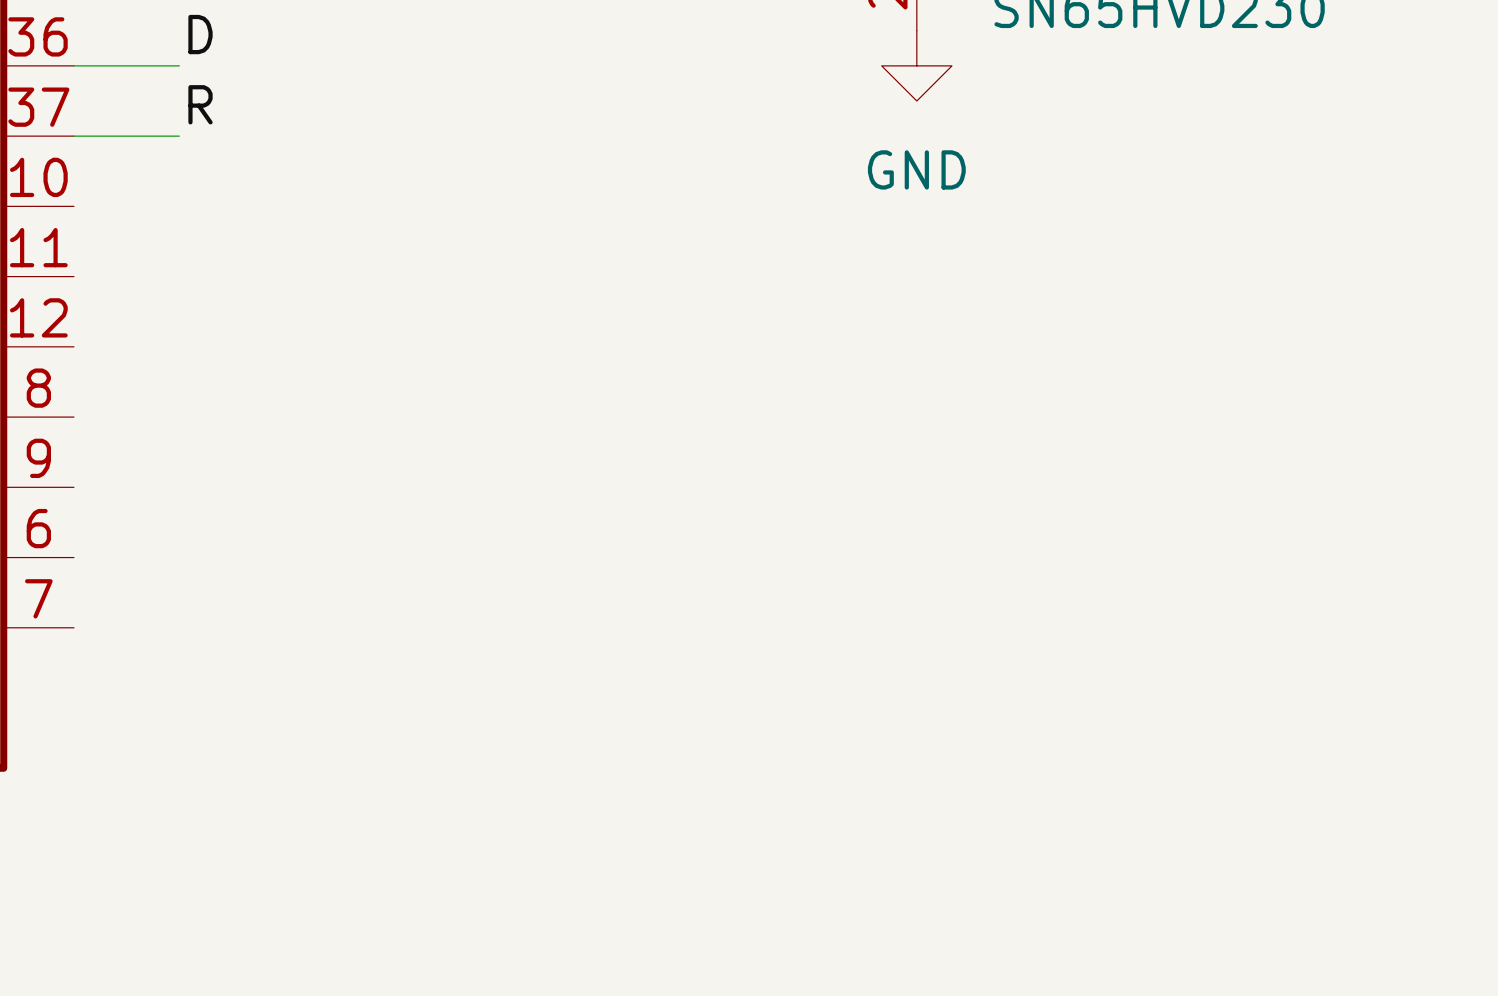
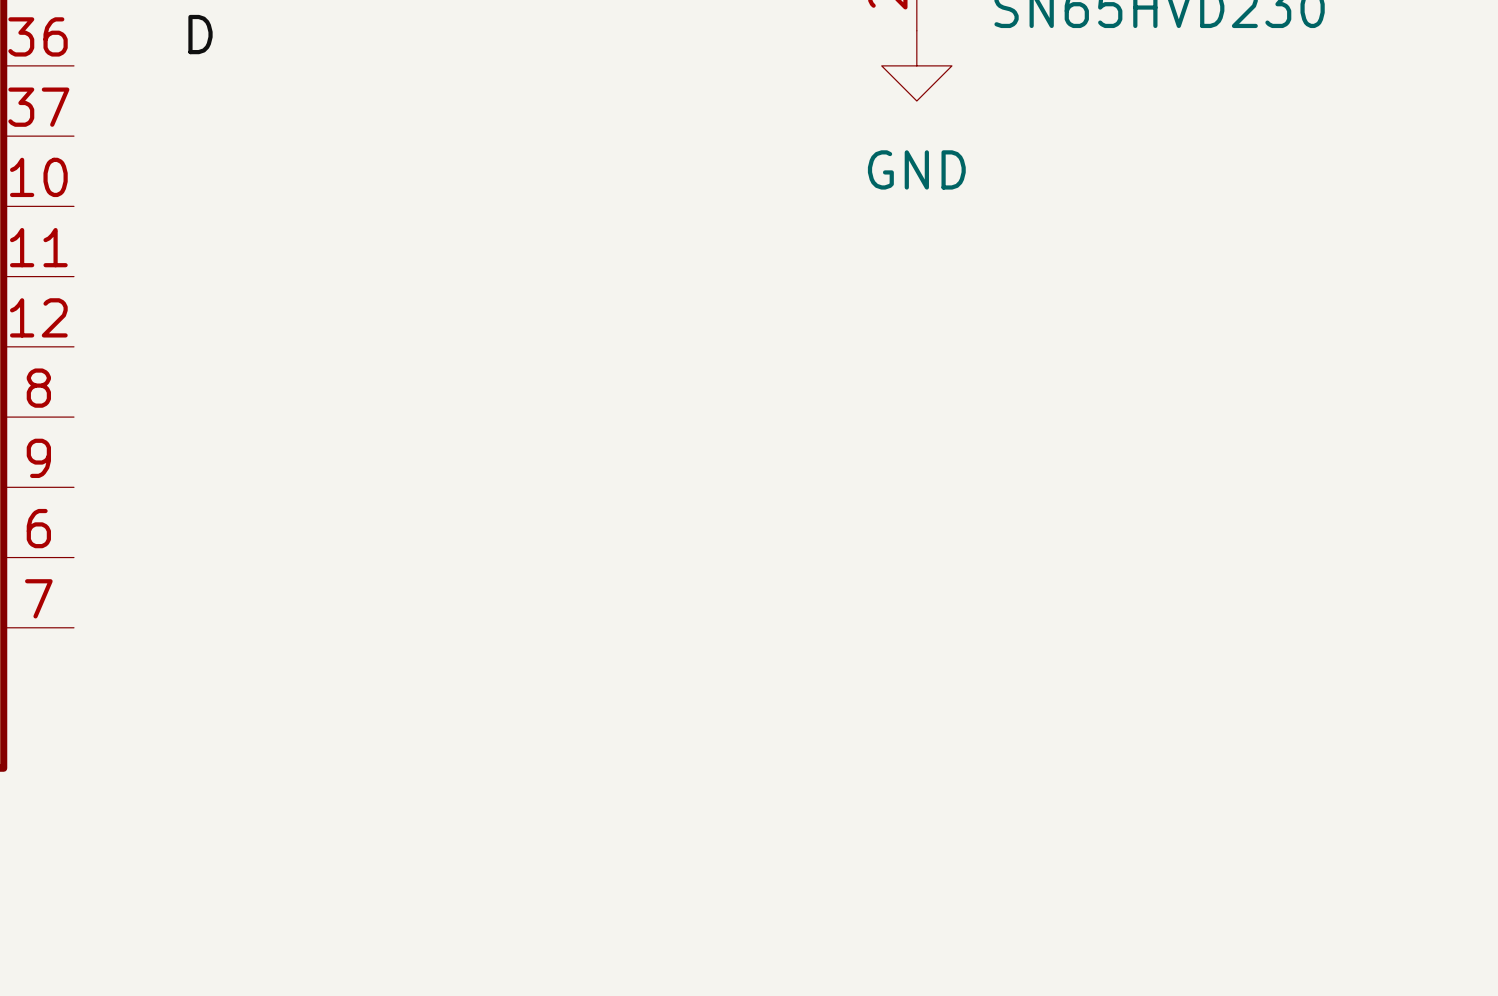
wire: (73, 65) (179, 65) -> none
label: R (200, 104) -> none
wire: (73, 136) (179, 136) -> none

